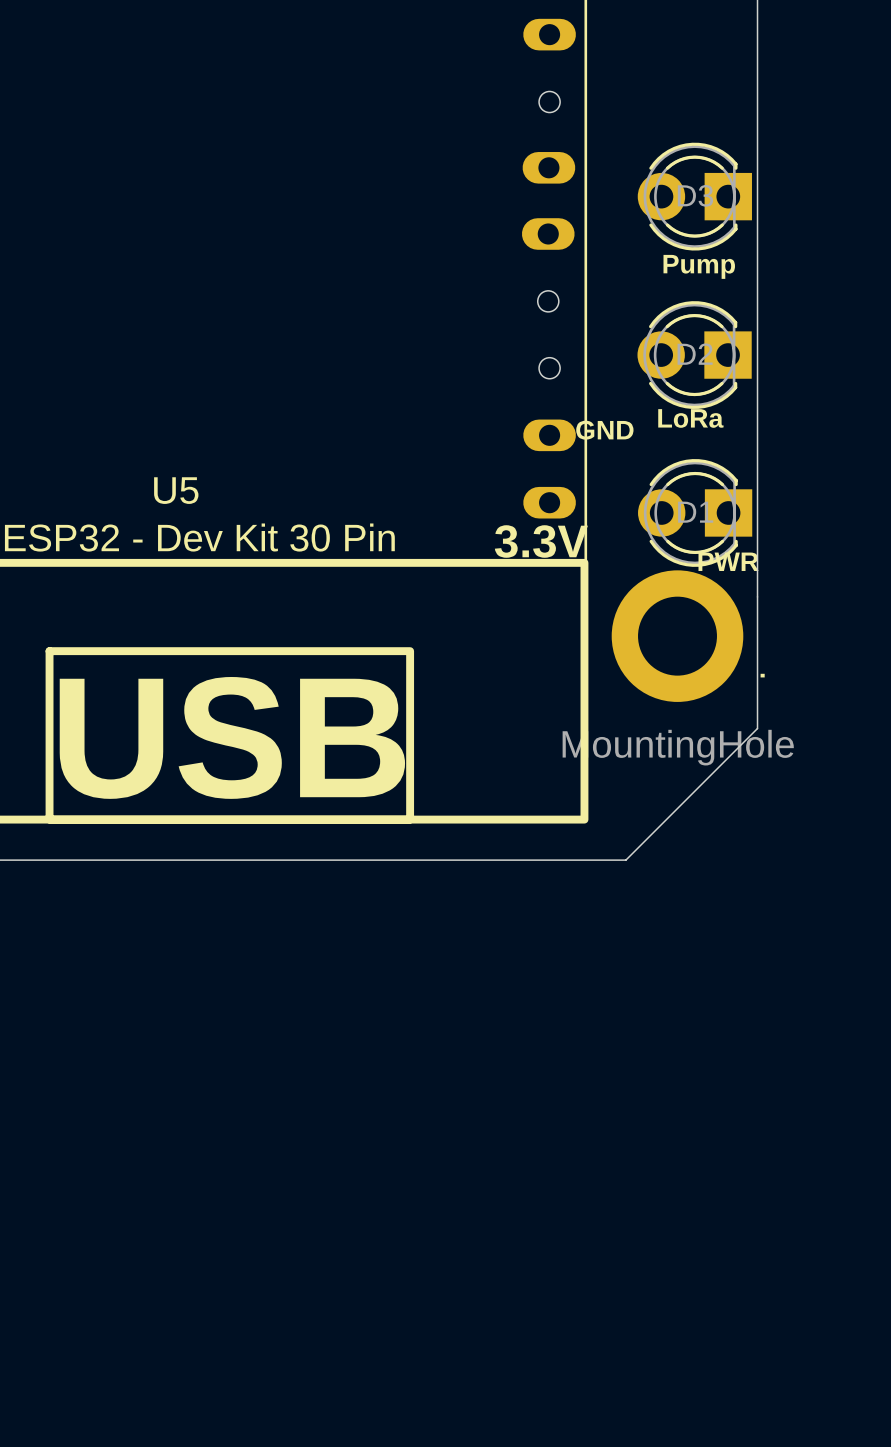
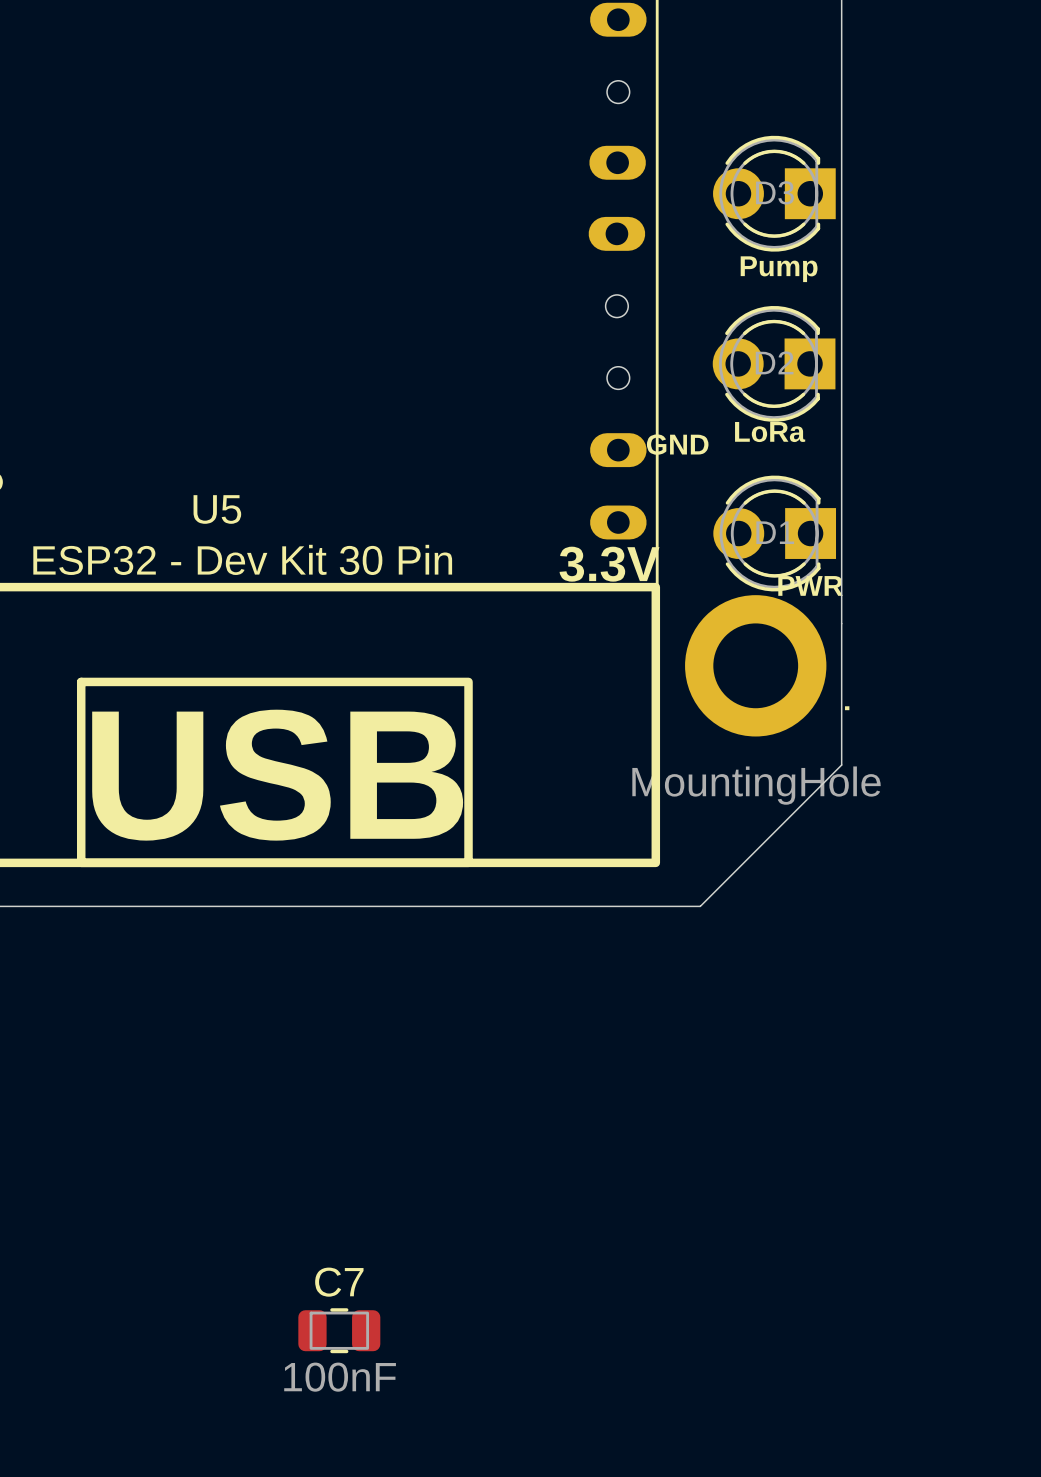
C7: none -> 100nF (339, 1330)

